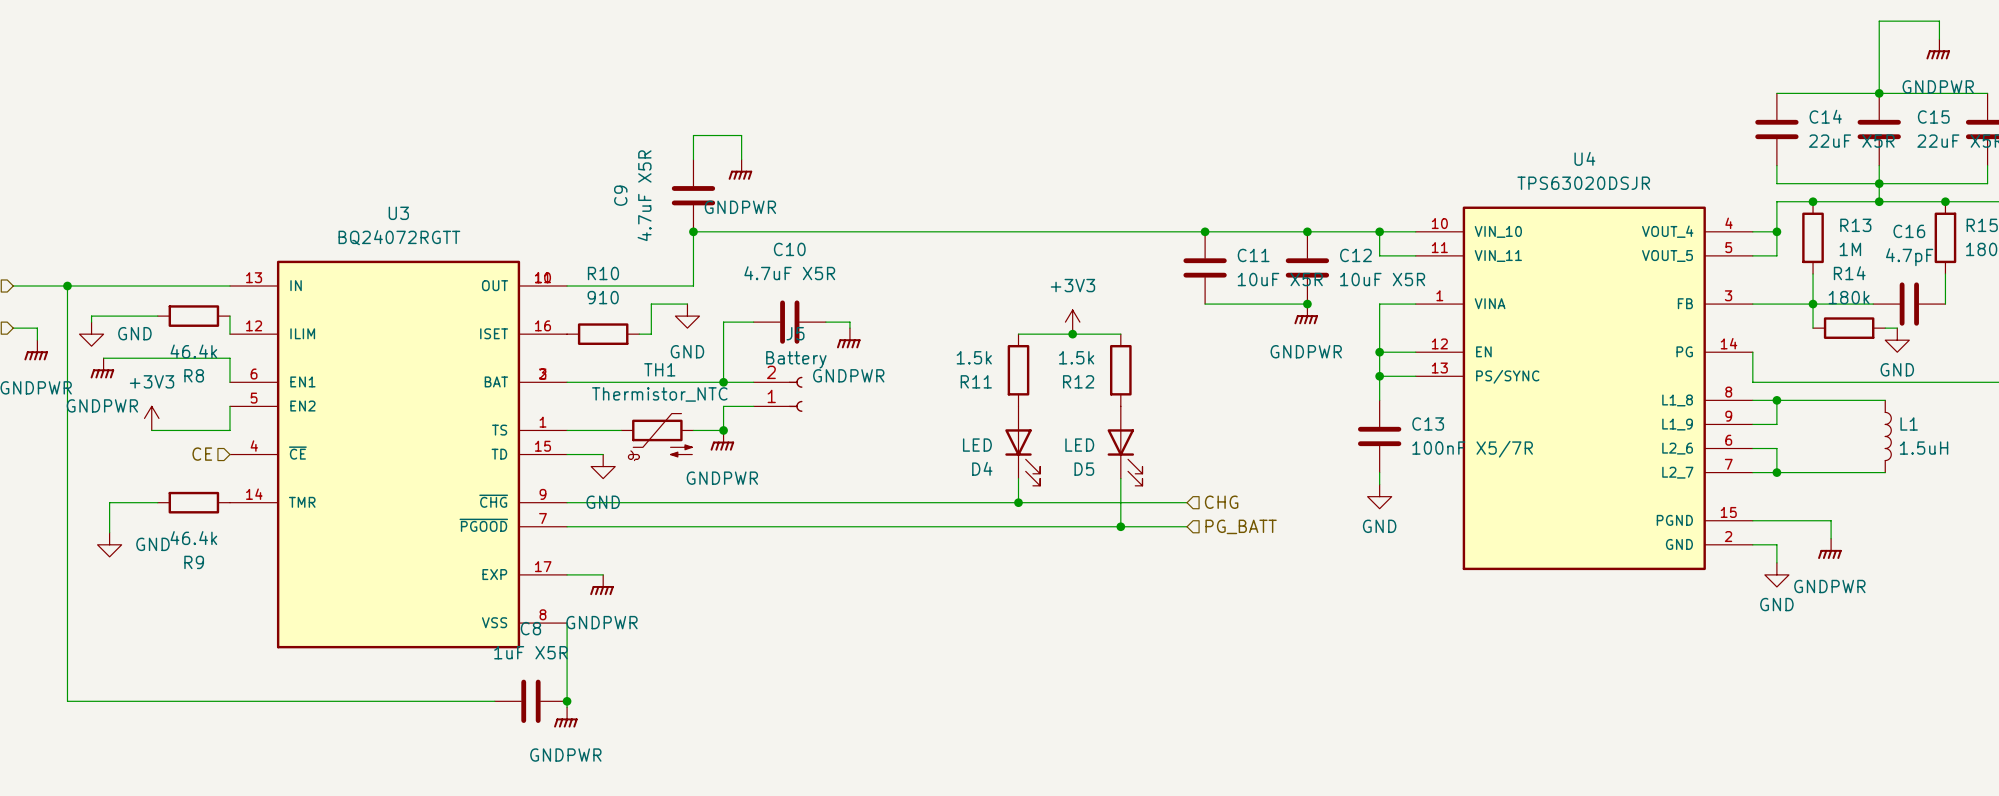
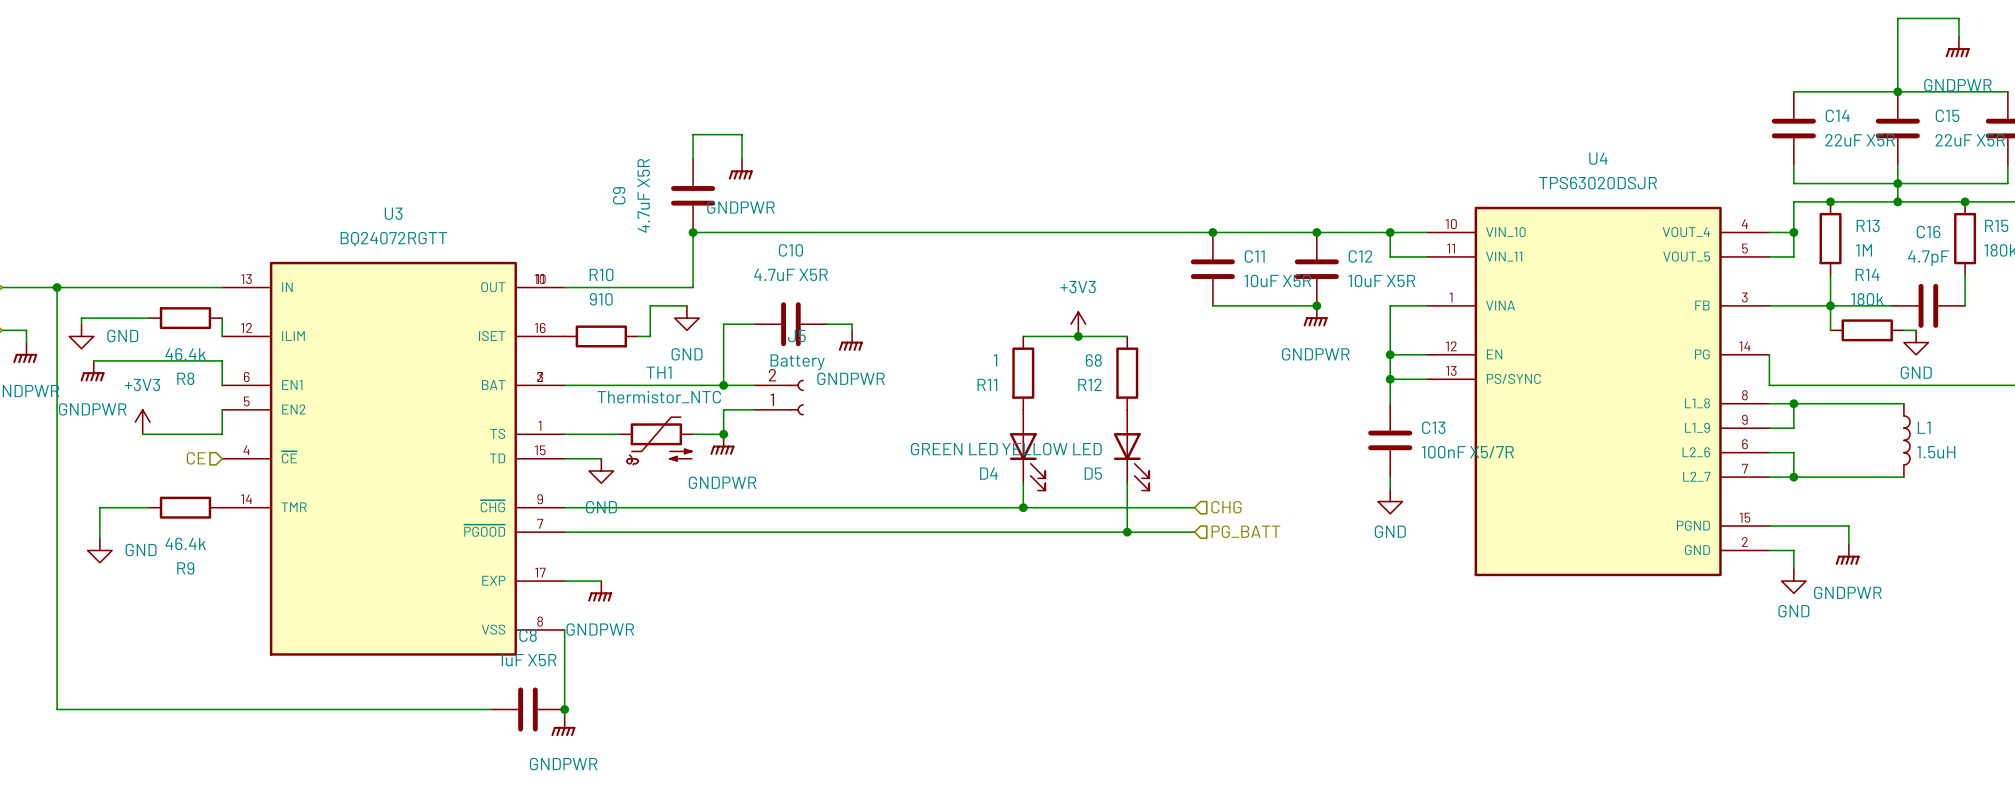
R11 value: 1.5k (974, 357) -> 1 (995, 360)
R12 value: 1.5k (1076, 357) -> 68 (1093, 360)
D4 value: LED (977, 445) -> GREEN LED (954, 449)
D5 value: LED (1079, 445) -> YELLOW LED (1051, 449)

